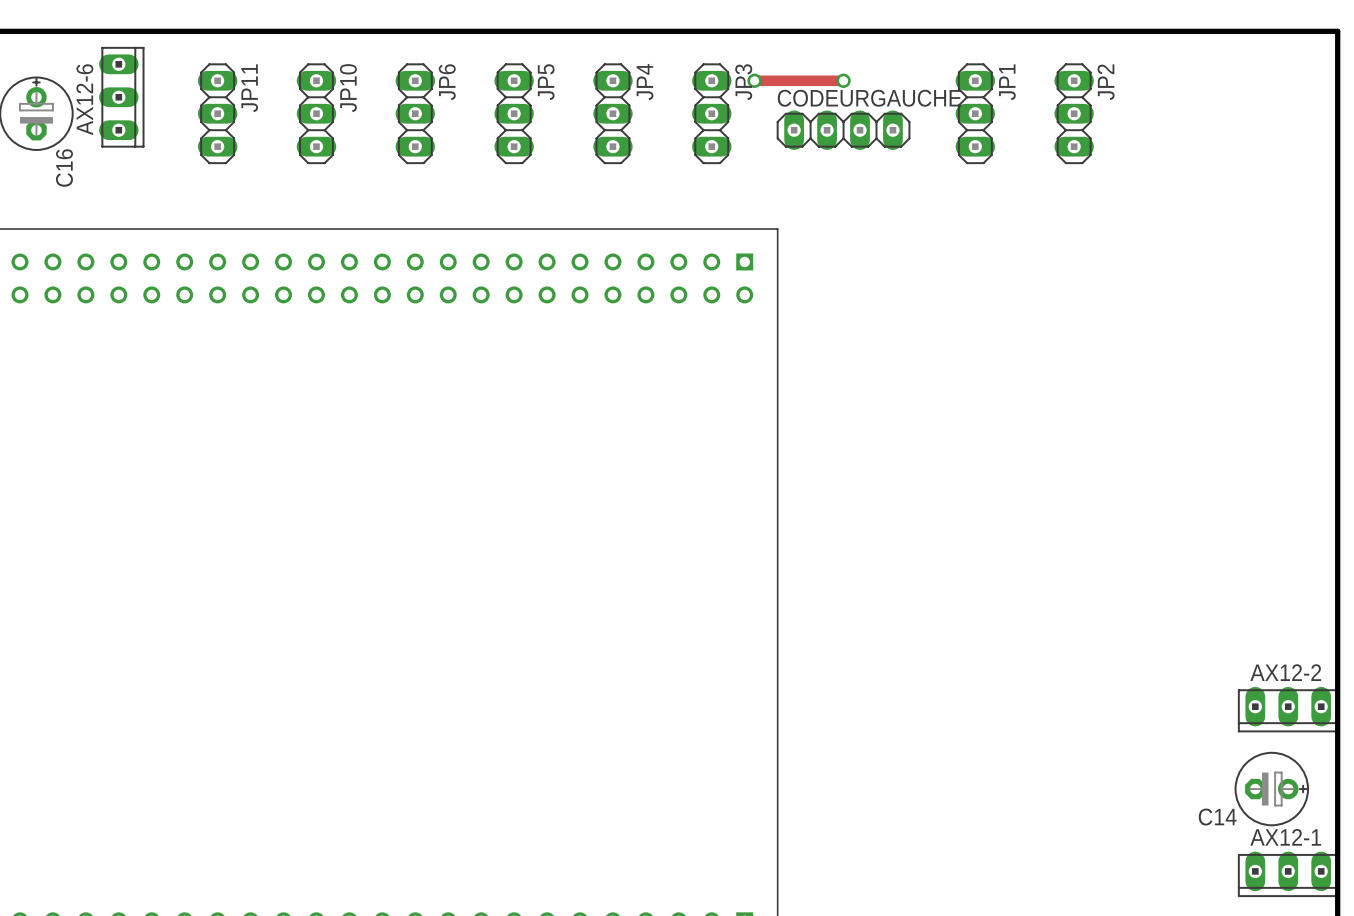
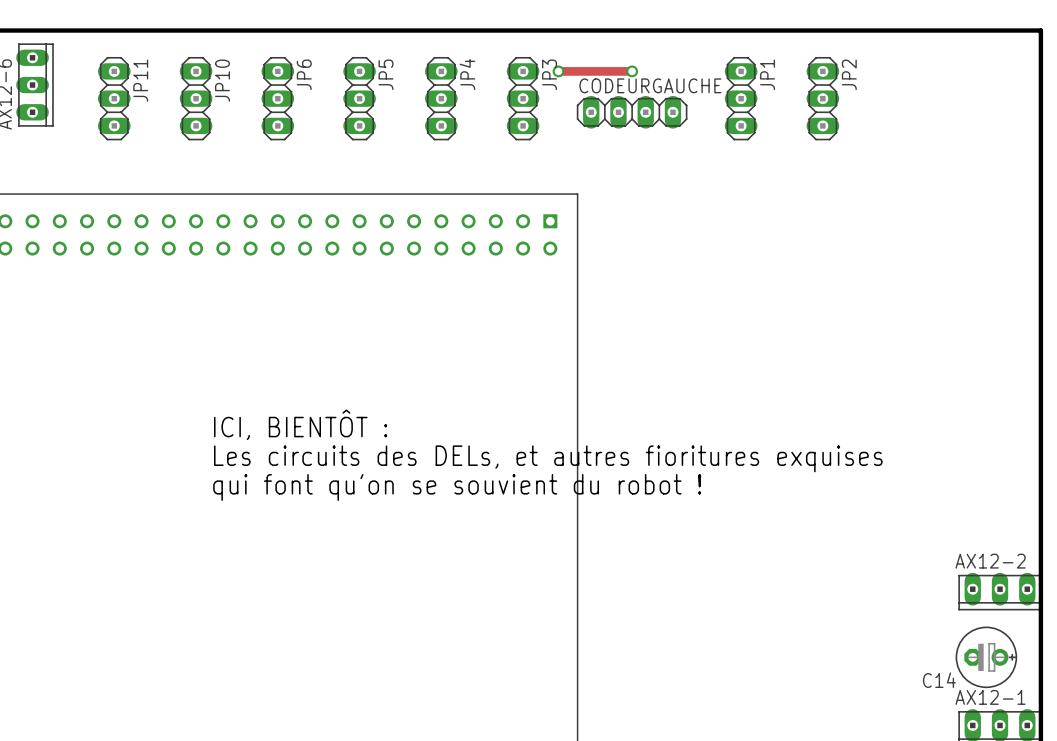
text: none -> ICI, BIENTÔT : (300, 424)
text: none -> Les circuits des DELs, et autres fioritures exquises (548, 458)
text: none -> qui font qu'on se souvient du robot ! (457, 487)

